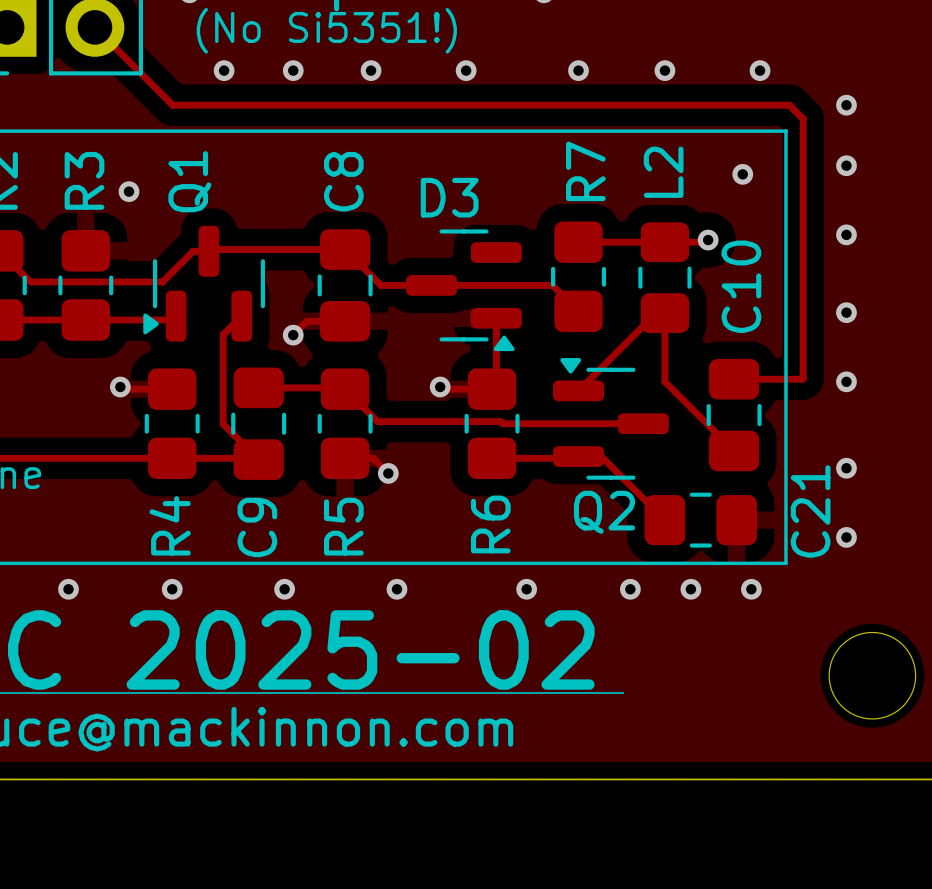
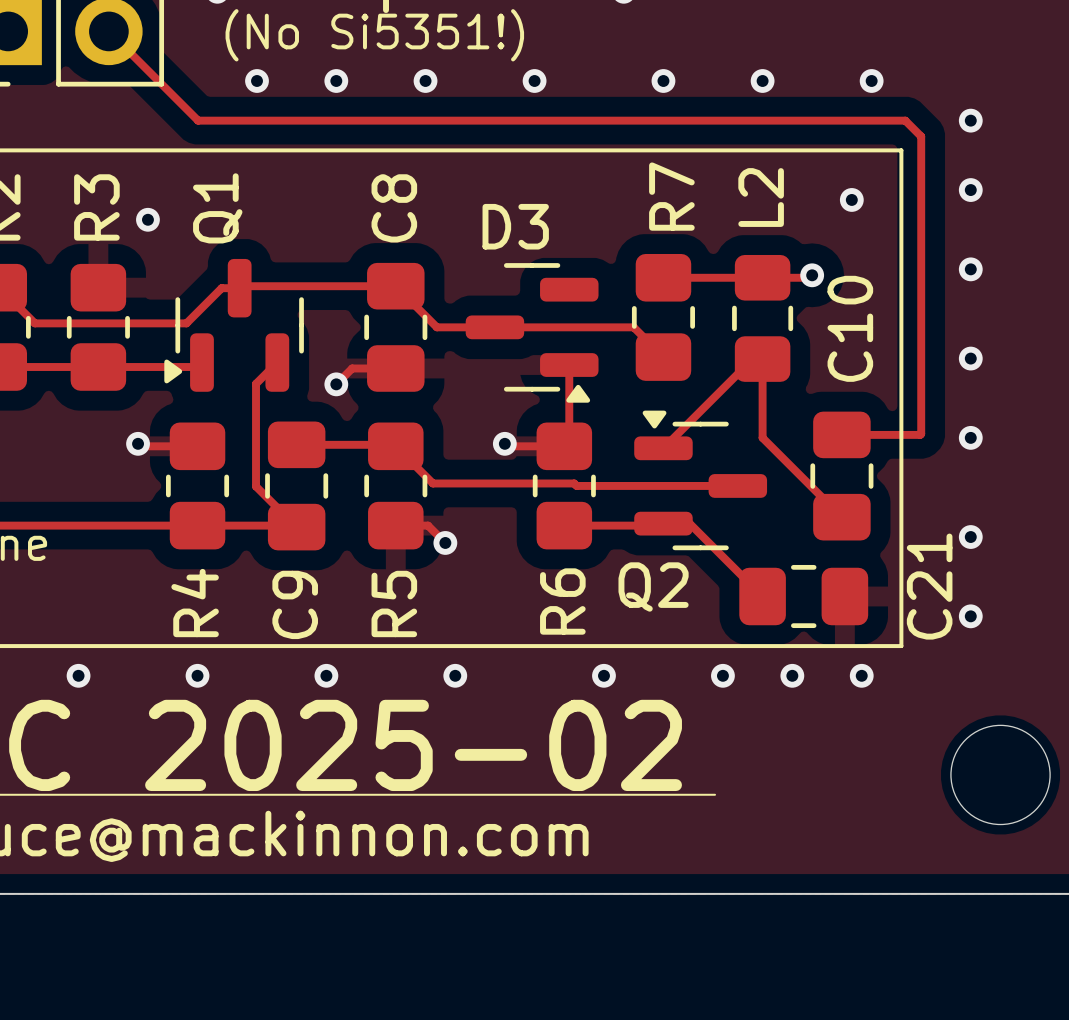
Q2 name position: Q2 (604, 512) -> Q2 (653, 586)

